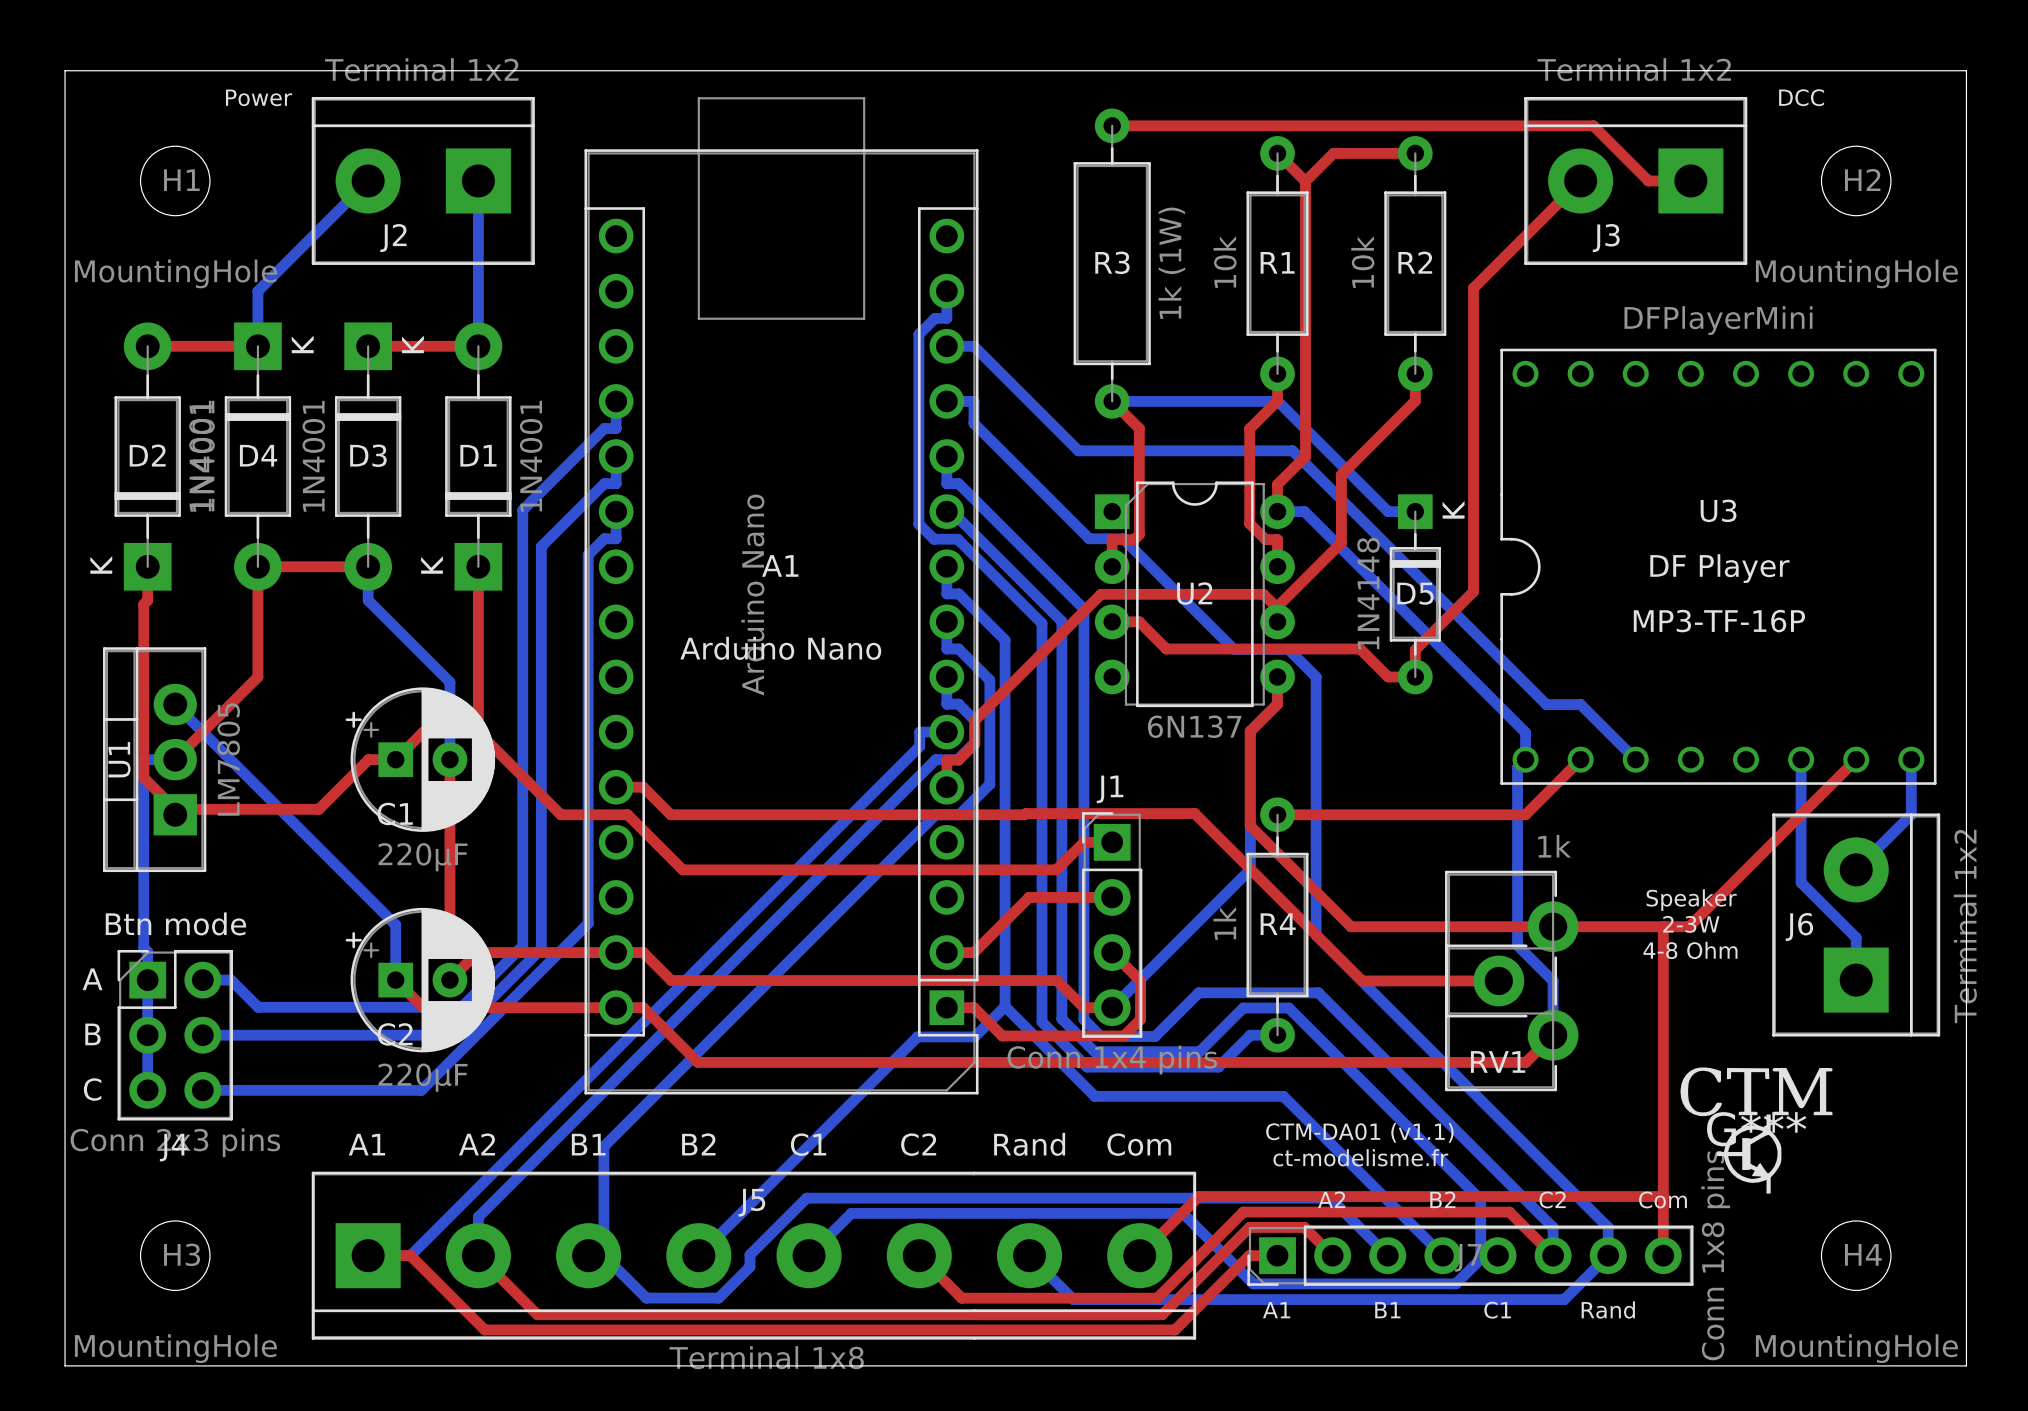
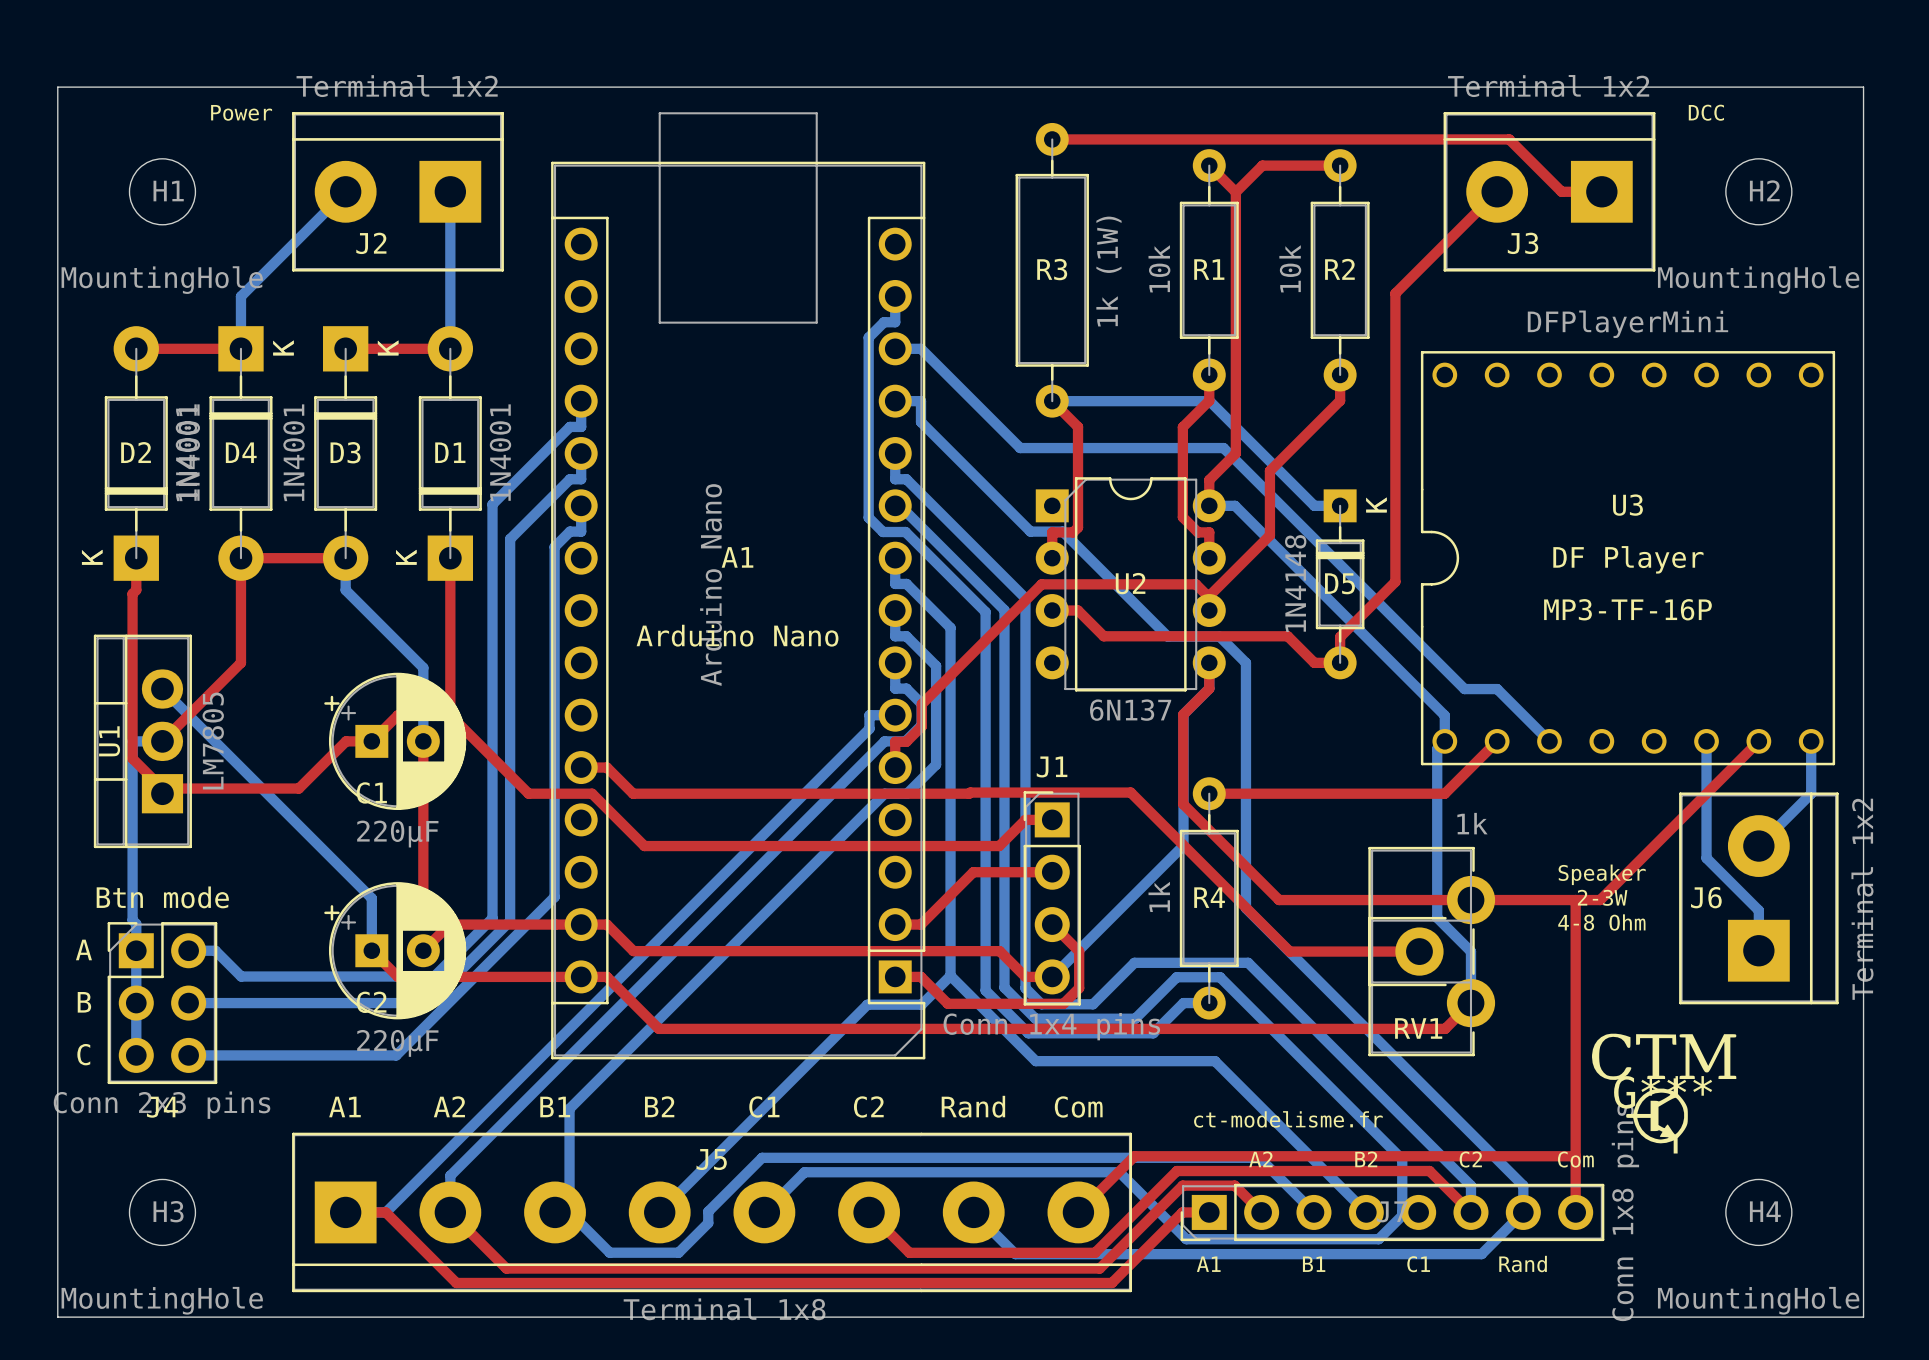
text: CTM-DA01 (v1.1) (1359, 1132) -> none

